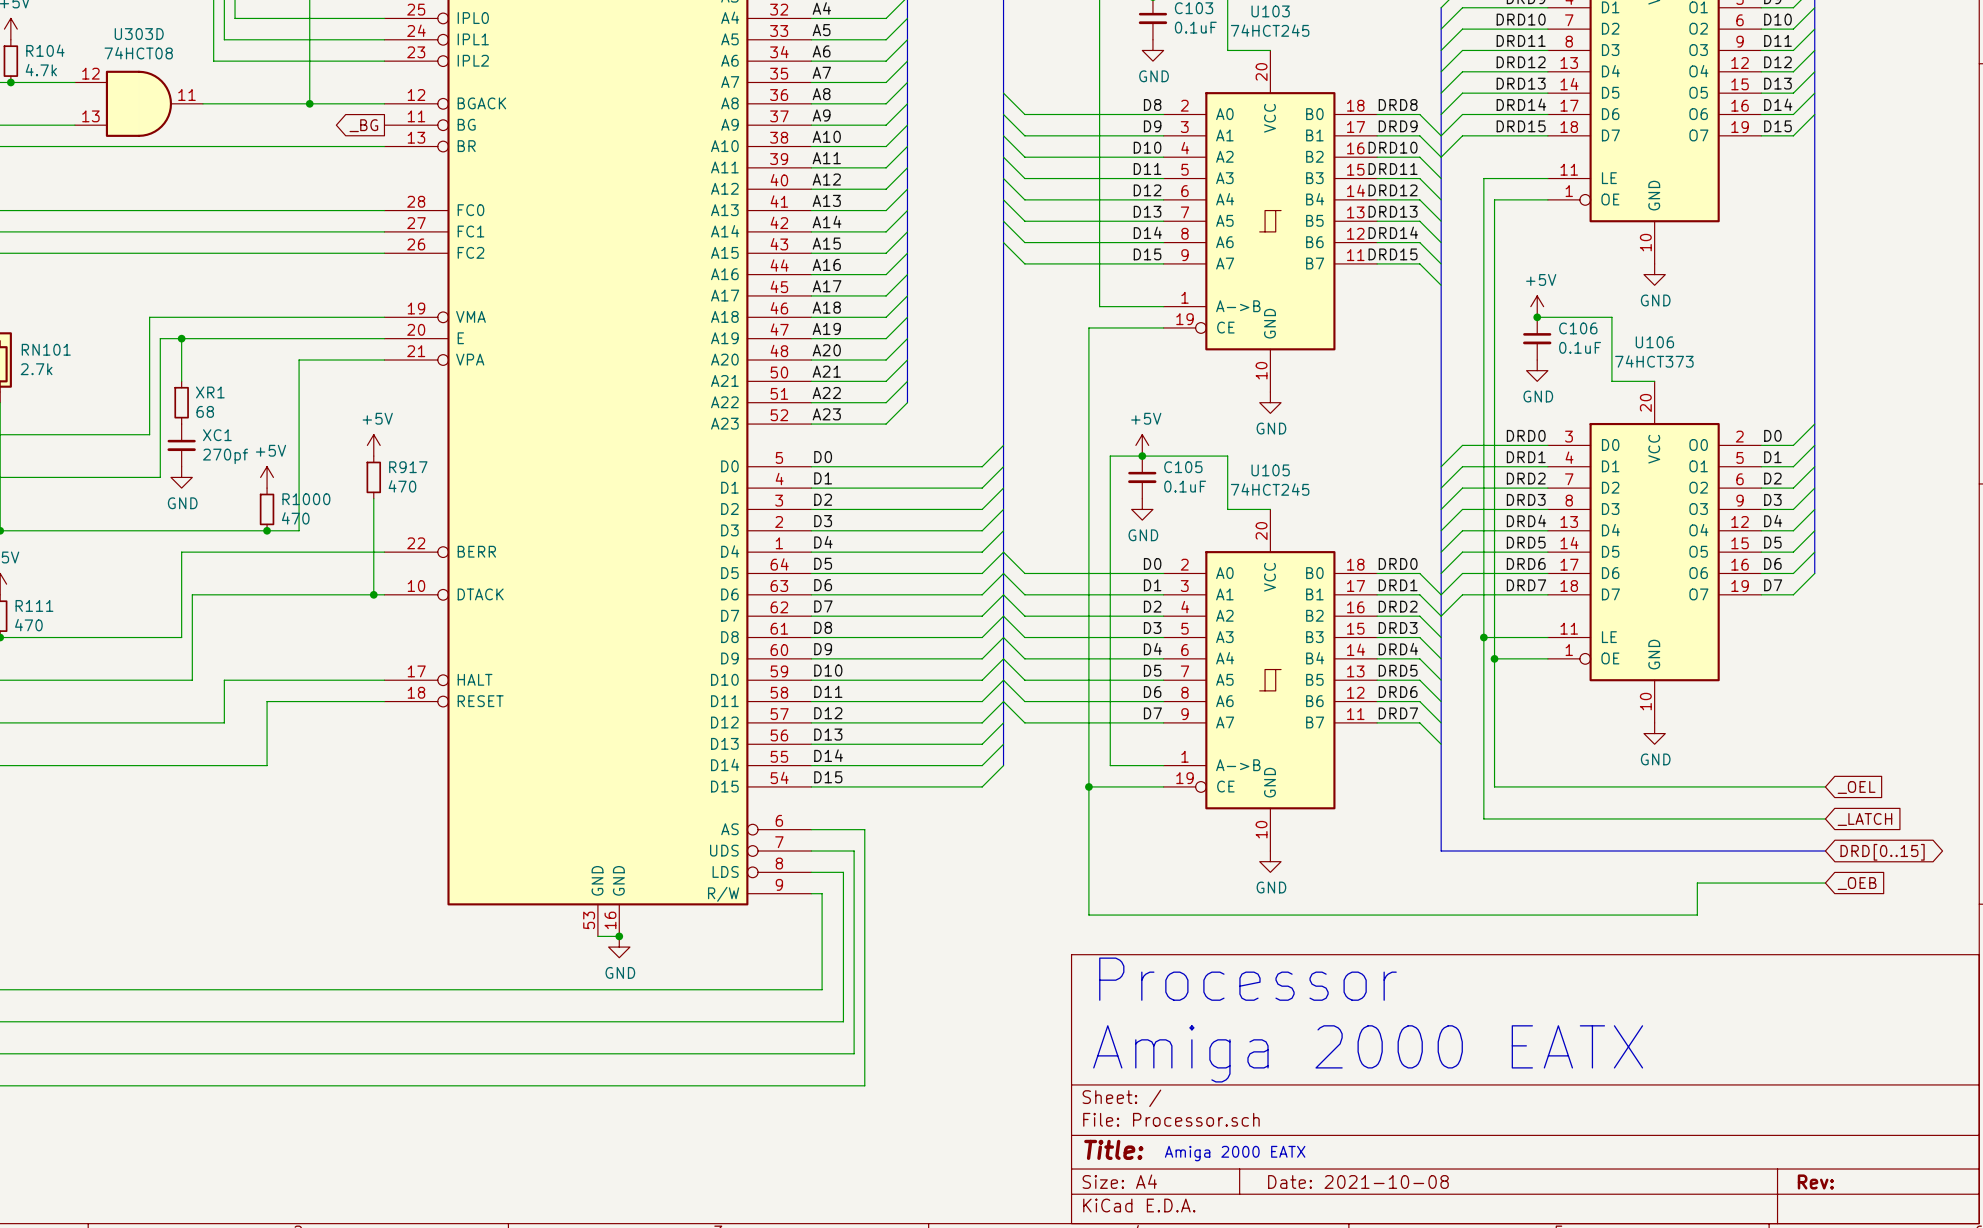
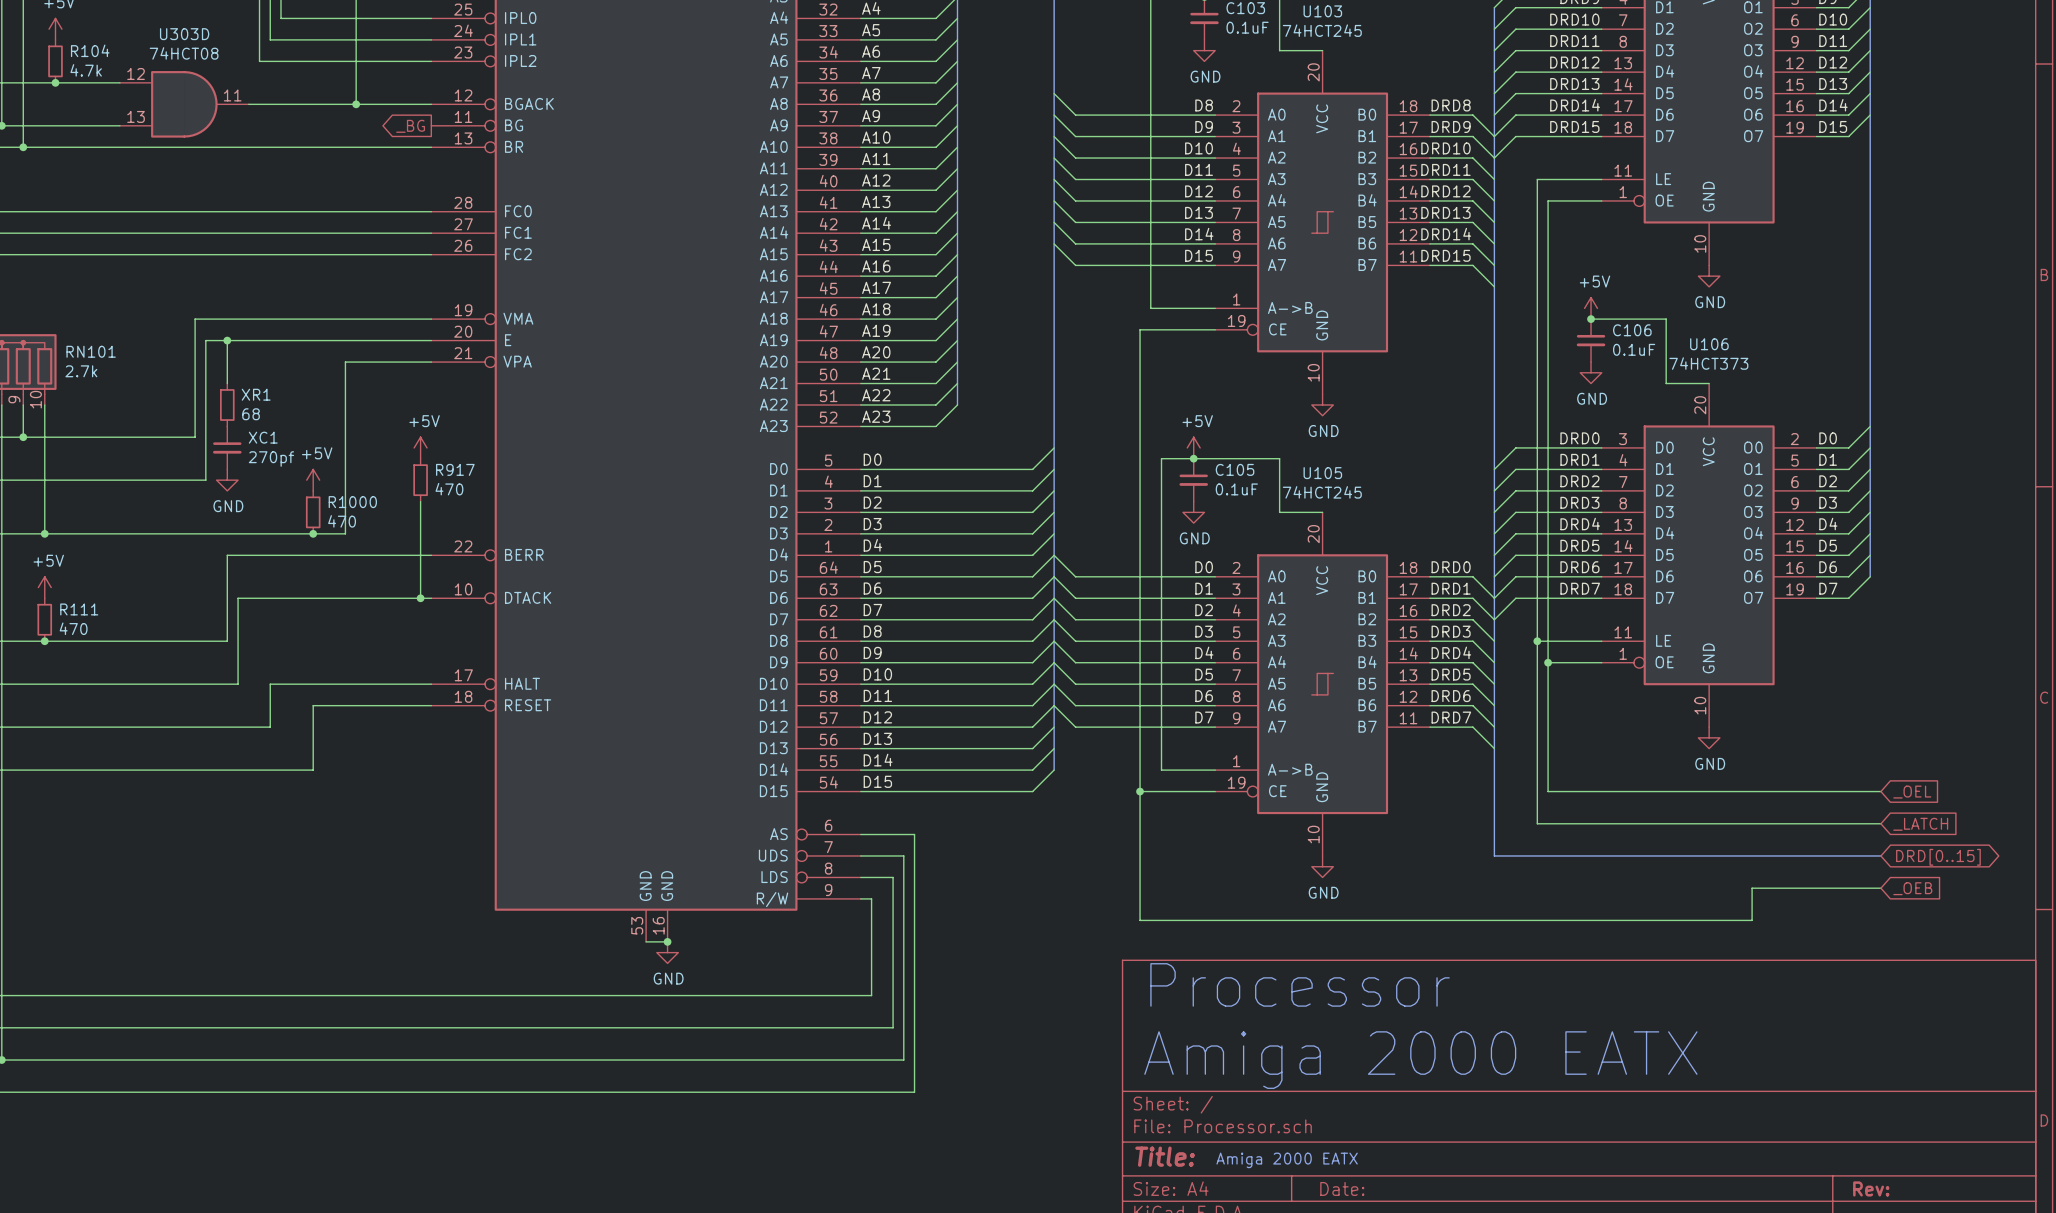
title block: Date: 2021-10-08 (1358, 1181) -> Date: (1342, 1188)

